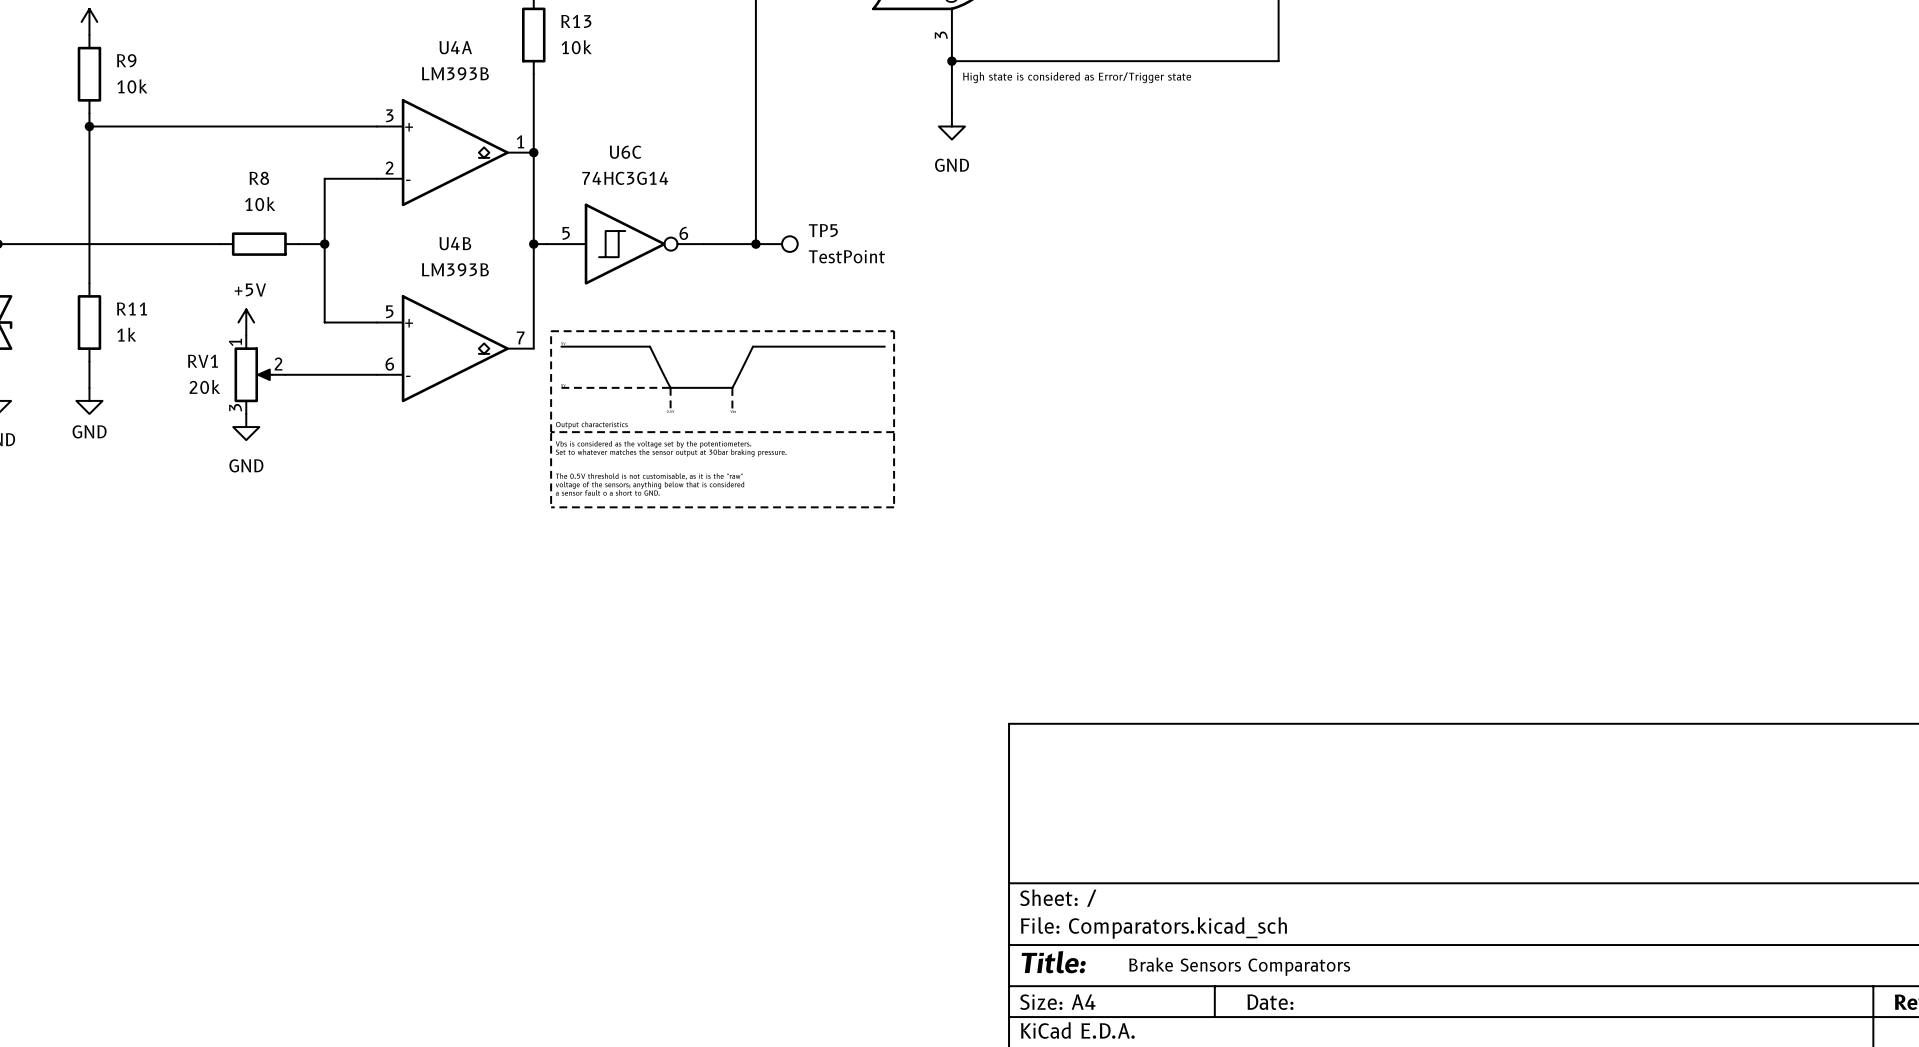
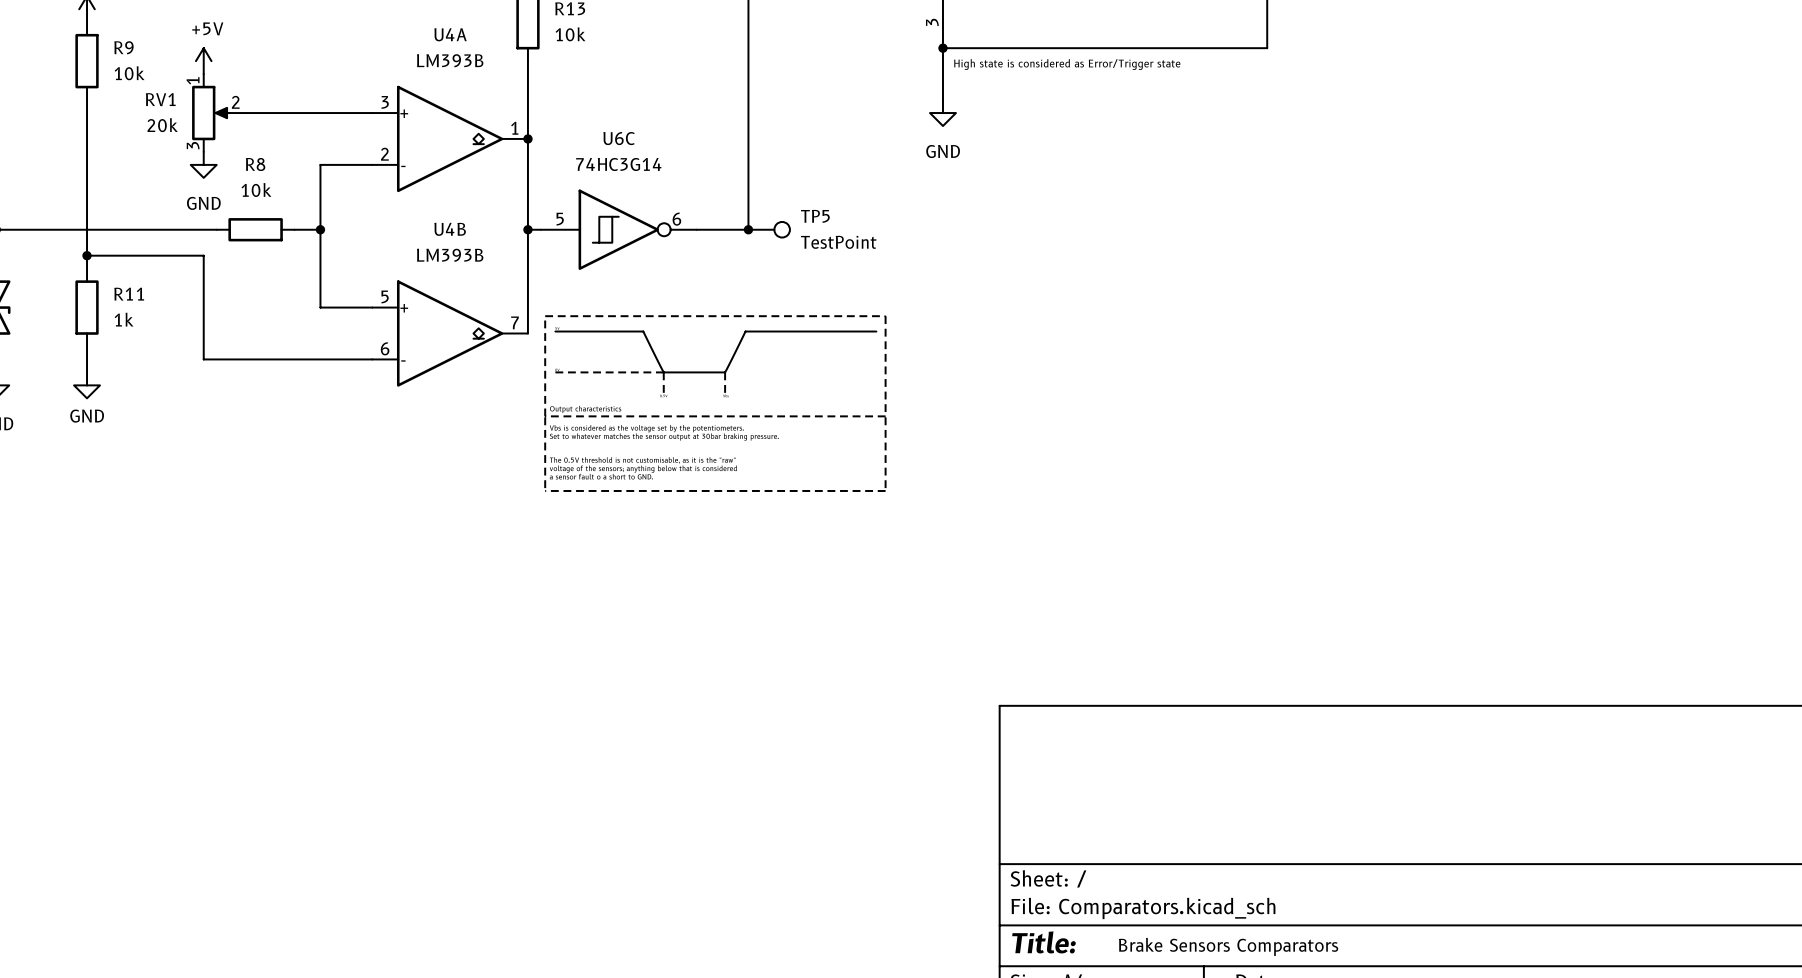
wire: (89, 126) (246, 126) -> none
junction: (89, 126) -> none
wire: none -> (87, 255) (203, 255) (203, 359) (281, 359)
junction: none -> (87, 255)
power symbol position: +5V (246, 322) -> +5V (203, 61)
RV1 position: (259, 374) -> (217, 113)
power symbol position: GND (246, 427) -> GND (203, 164)

